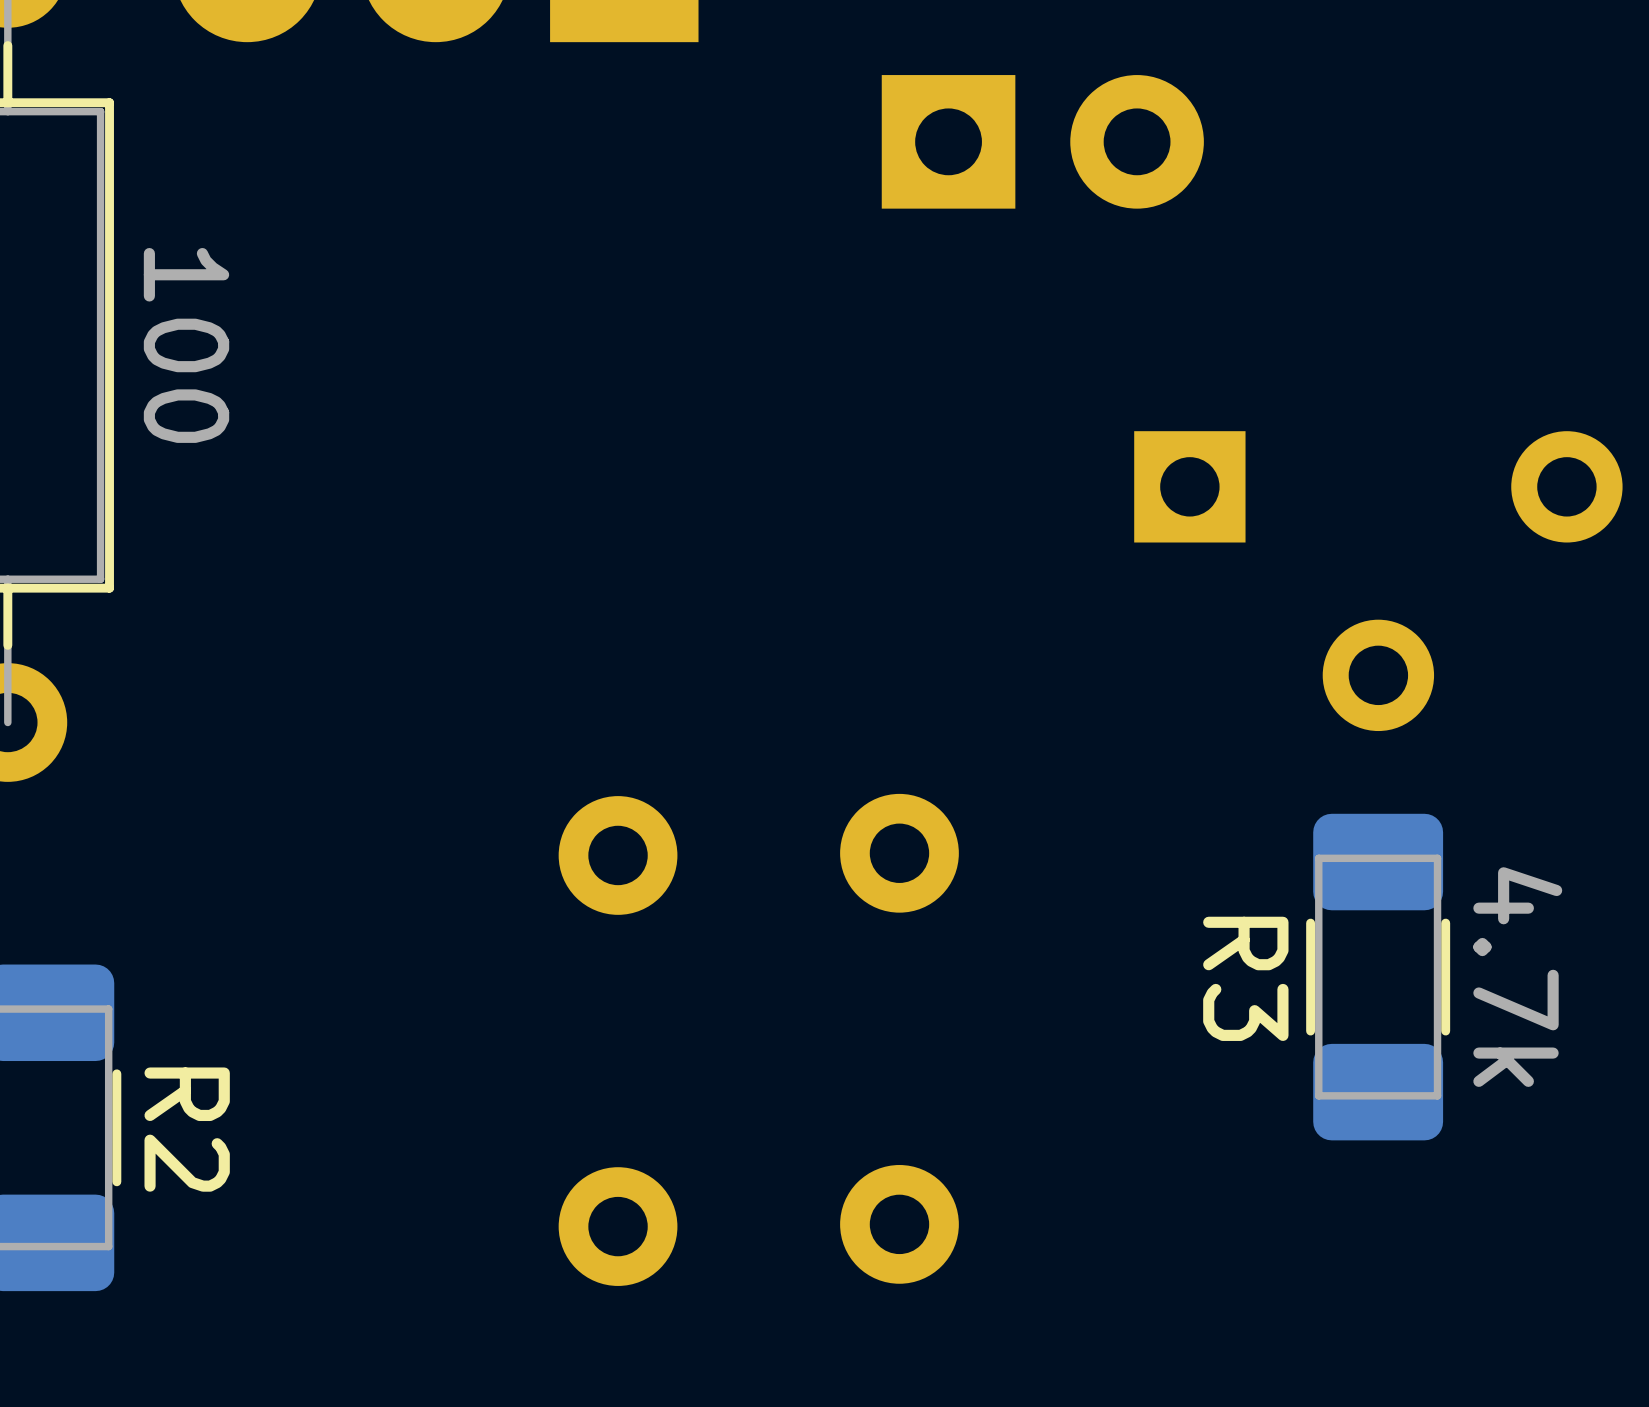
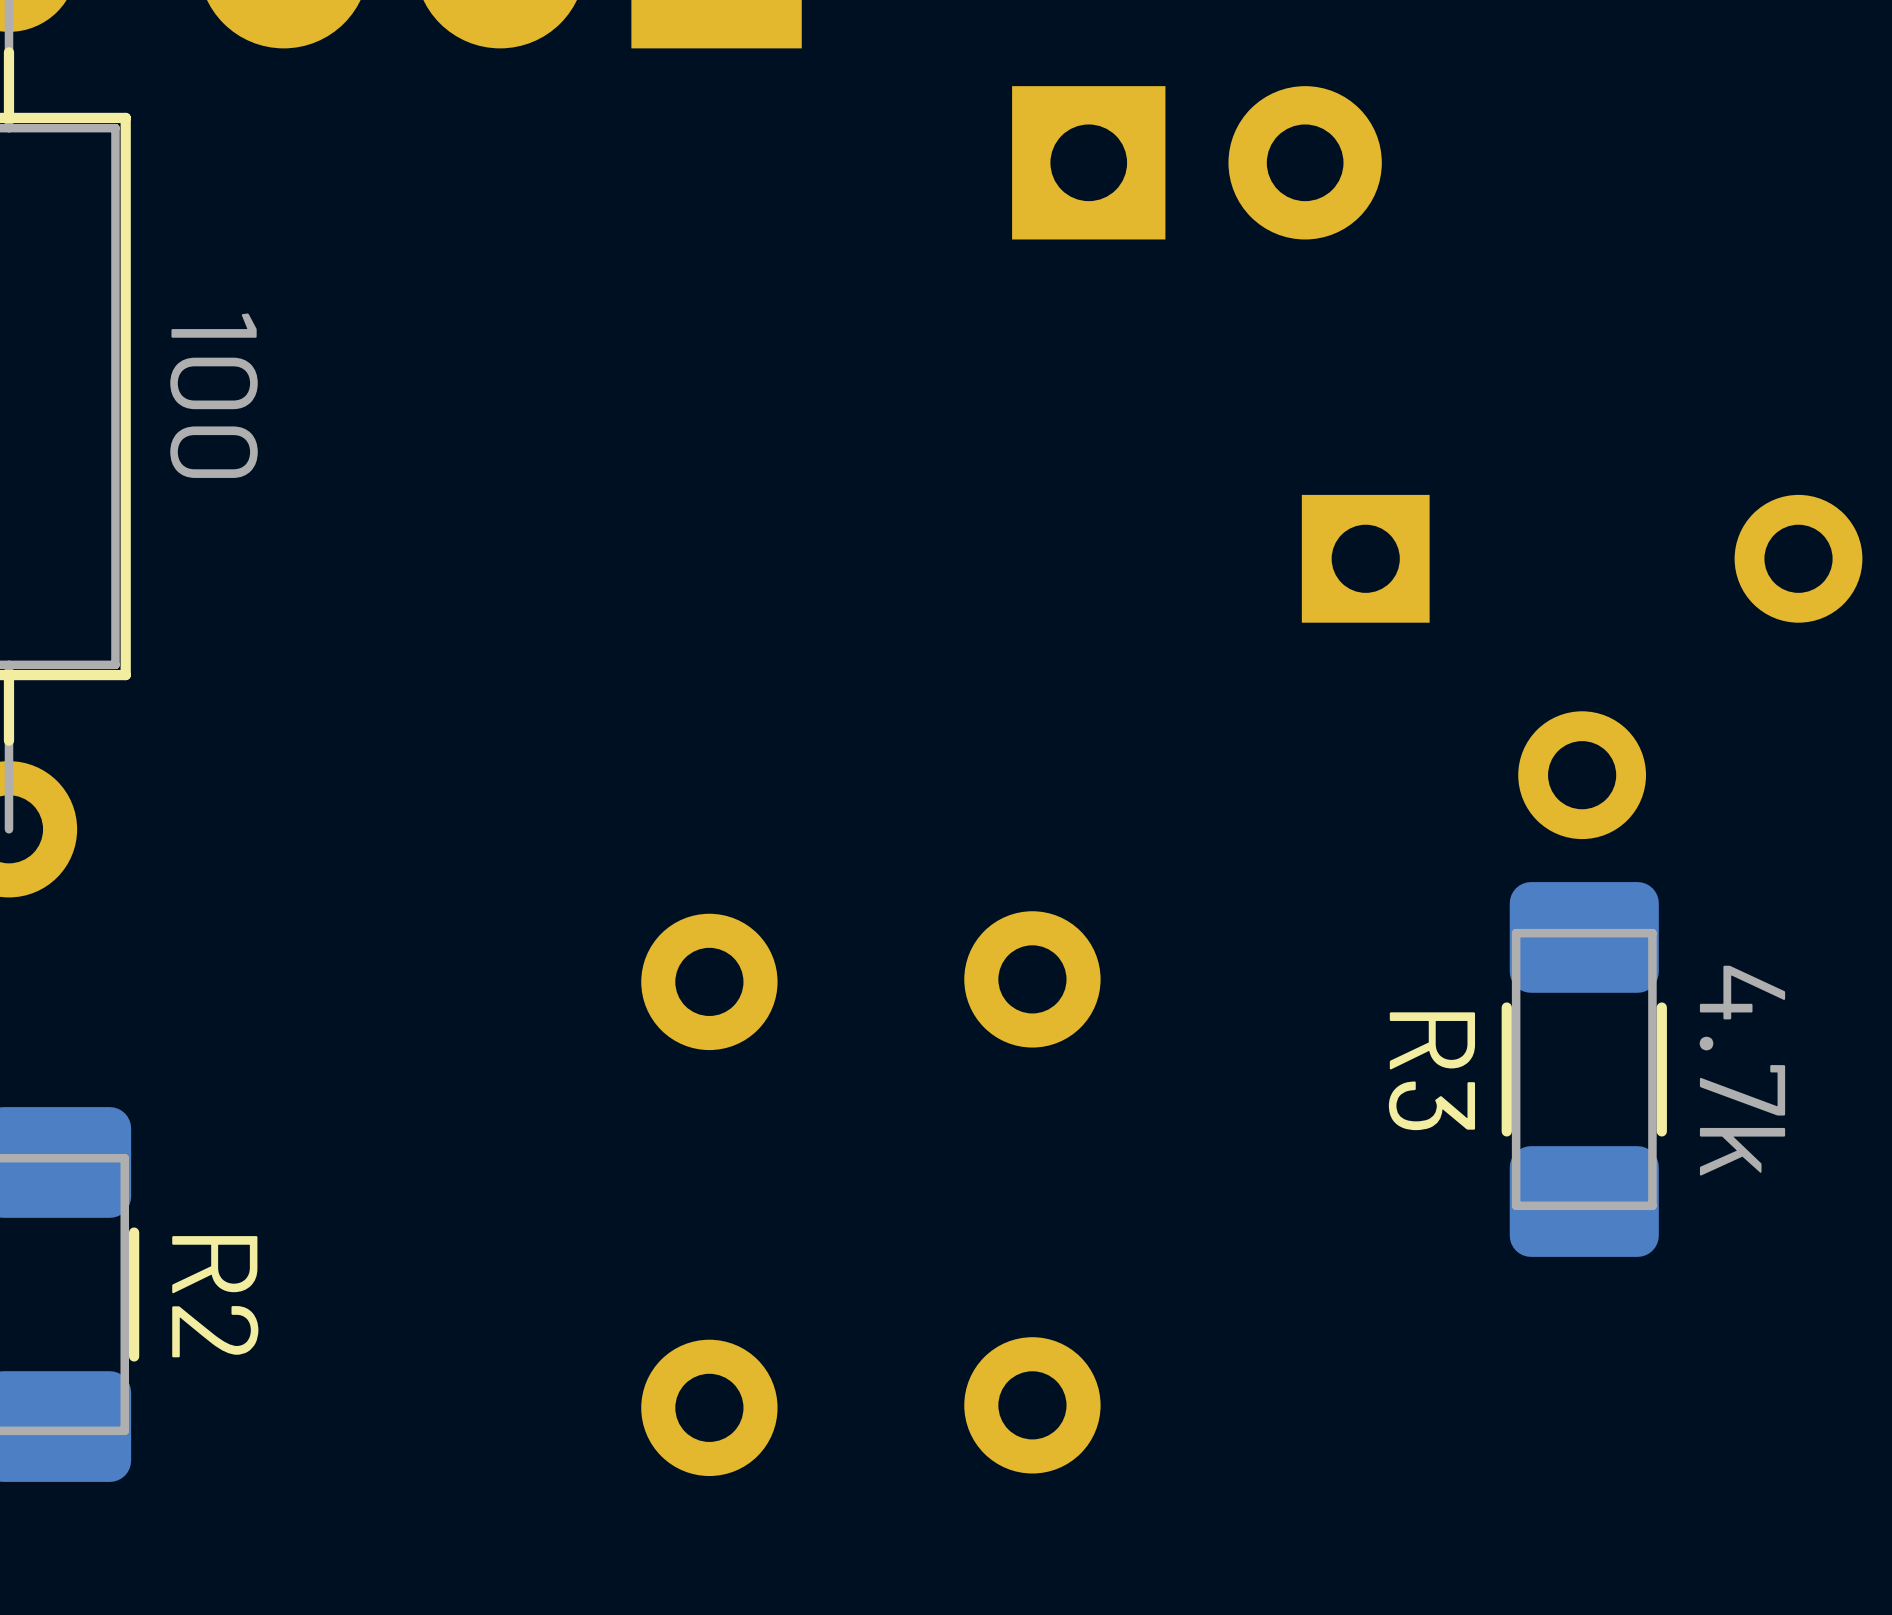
R3 position: (1378, 977) -> (1584, 1069)

